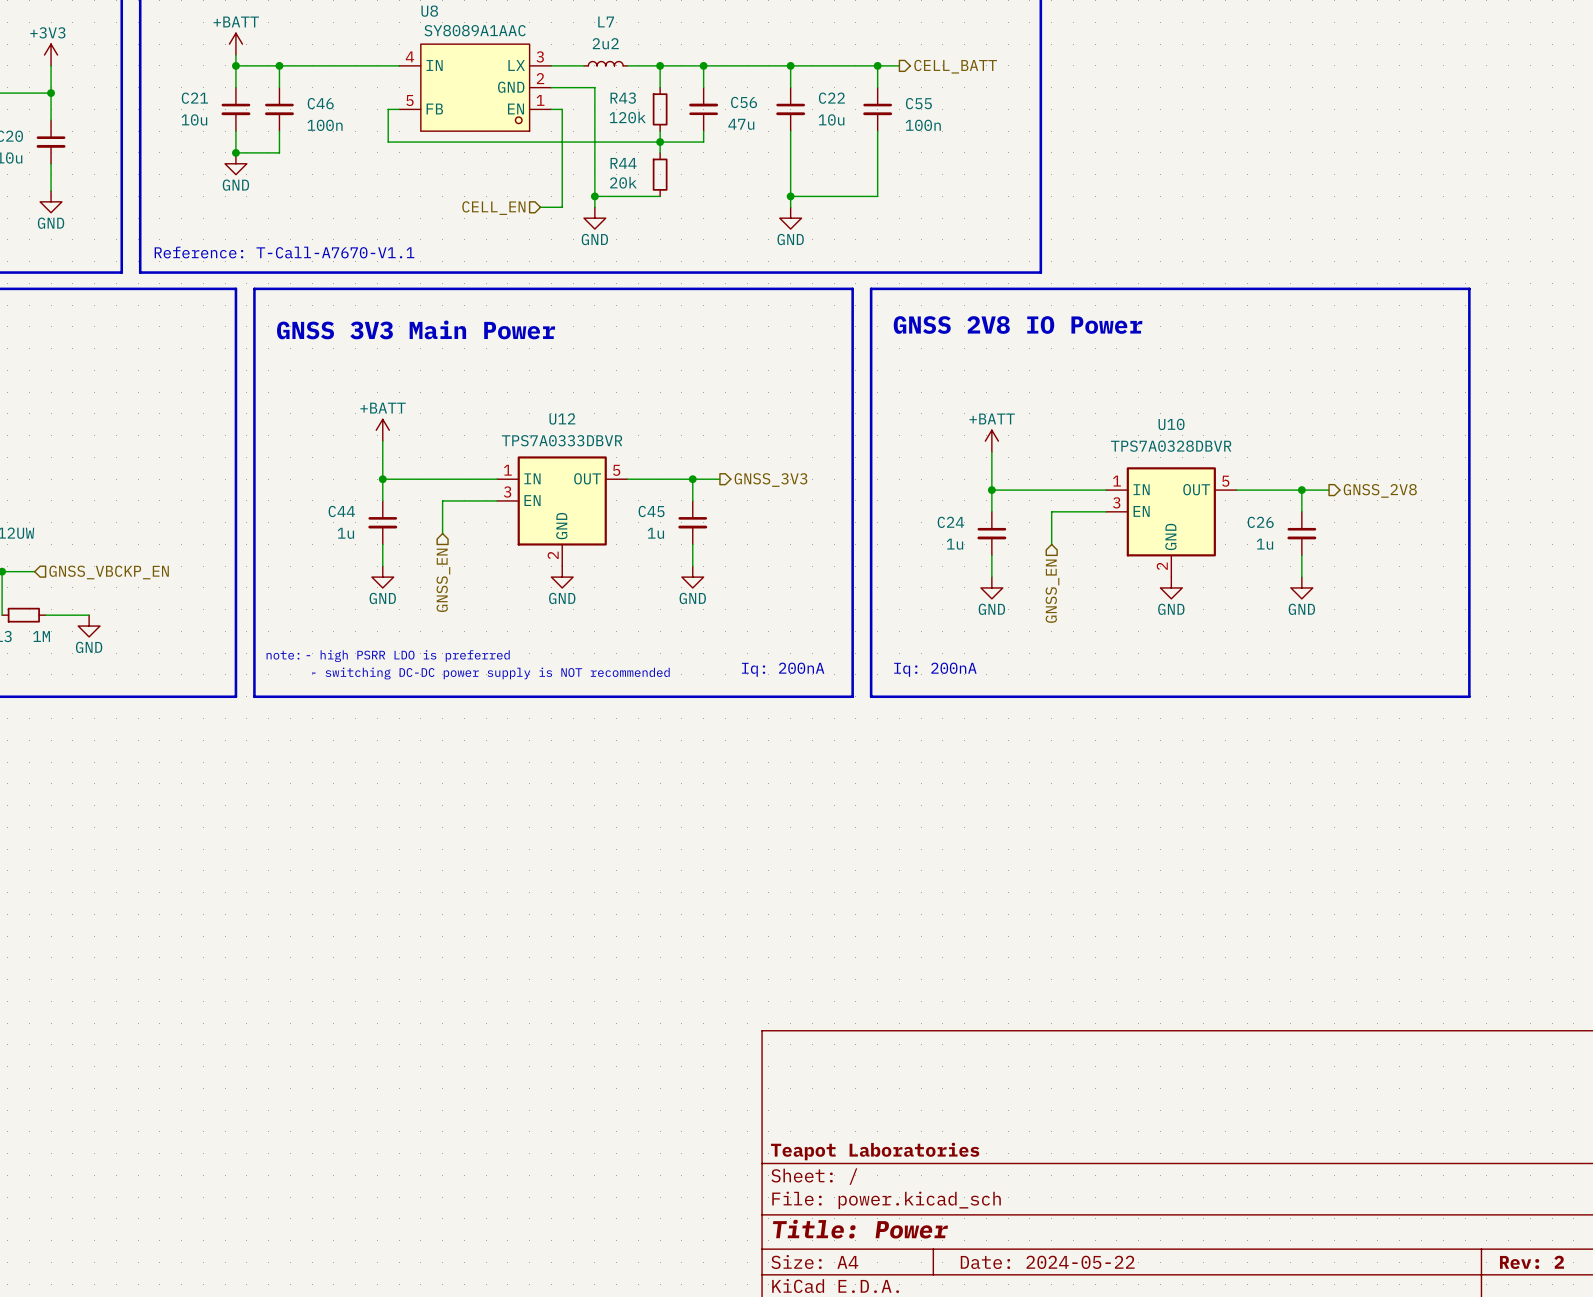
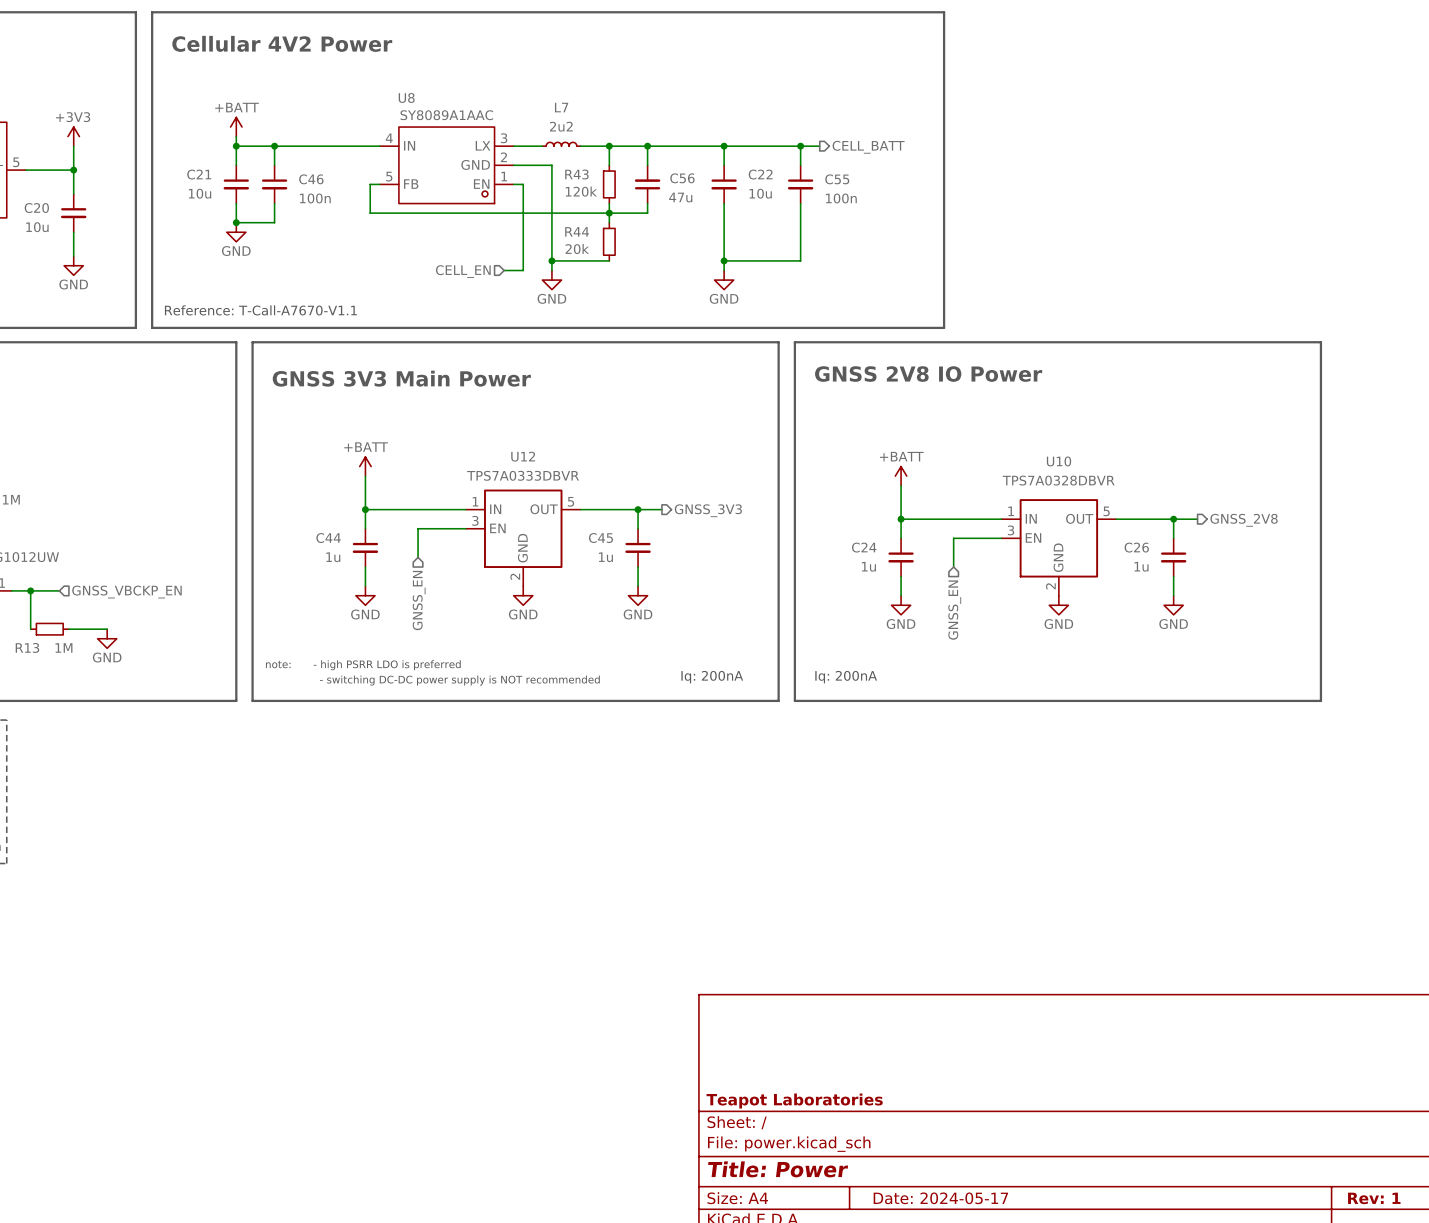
title block: Date: 2024-05-22 (1047, 1262) -> Date: 2024-05-17 (940, 1198)
title block: Rev: 2 (1531, 1262) -> Rev: 1 (1374, 1198)

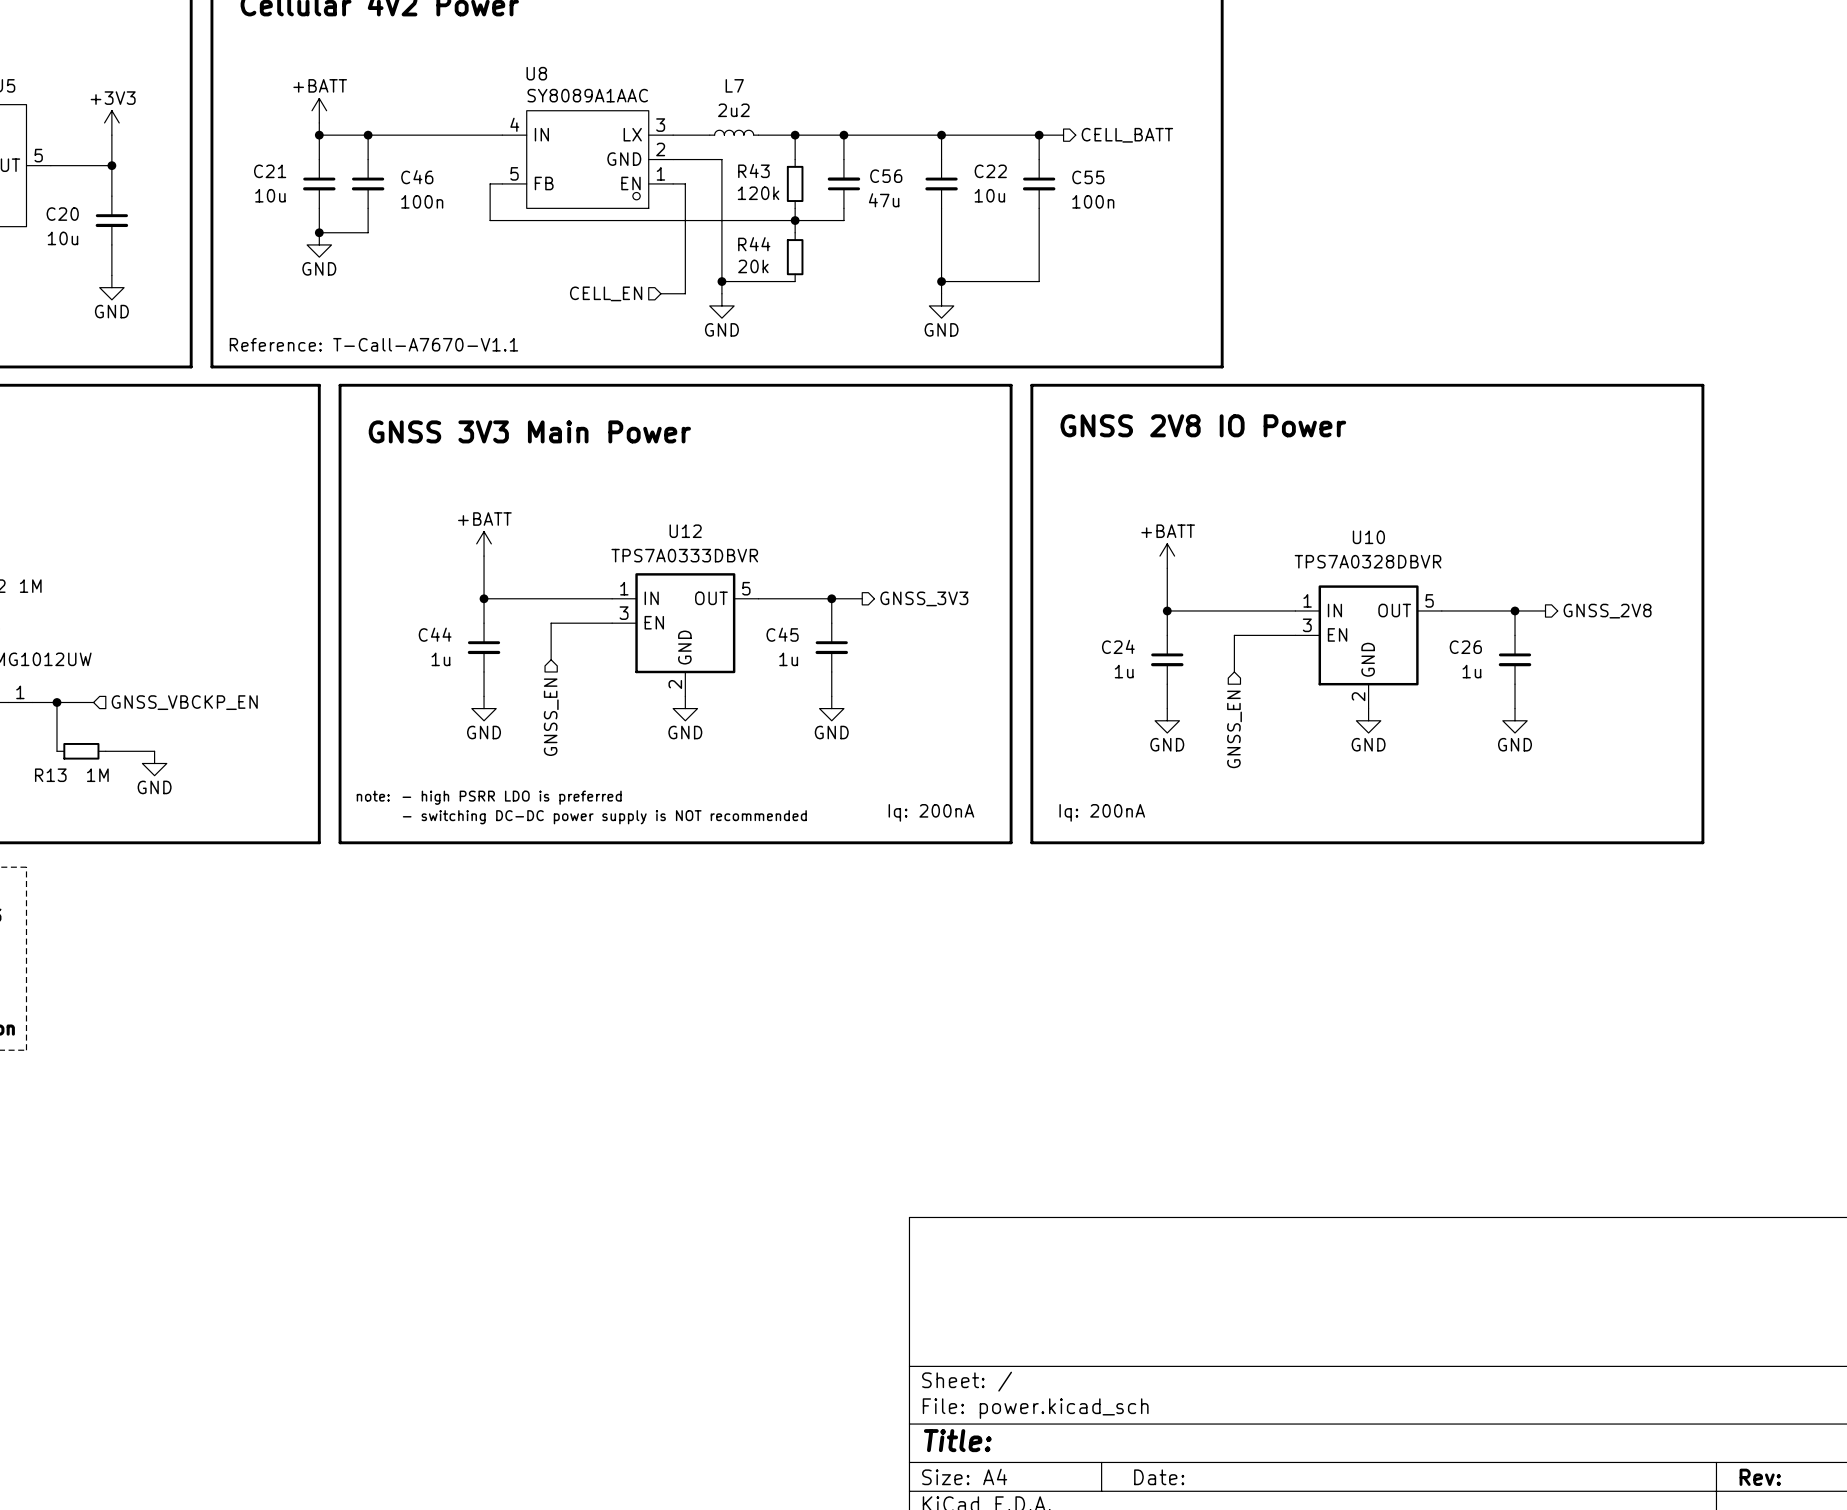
title block: Teapot Laboratories (794, 1101) -> none
title block: Title: Power (778, 1169) -> Title: (957, 1440)
title block: Date: 2024-05-17 (940, 1198) -> Date: (1159, 1477)
title block: Rev: 1 (1374, 1198) -> Rev: (1760, 1477)

